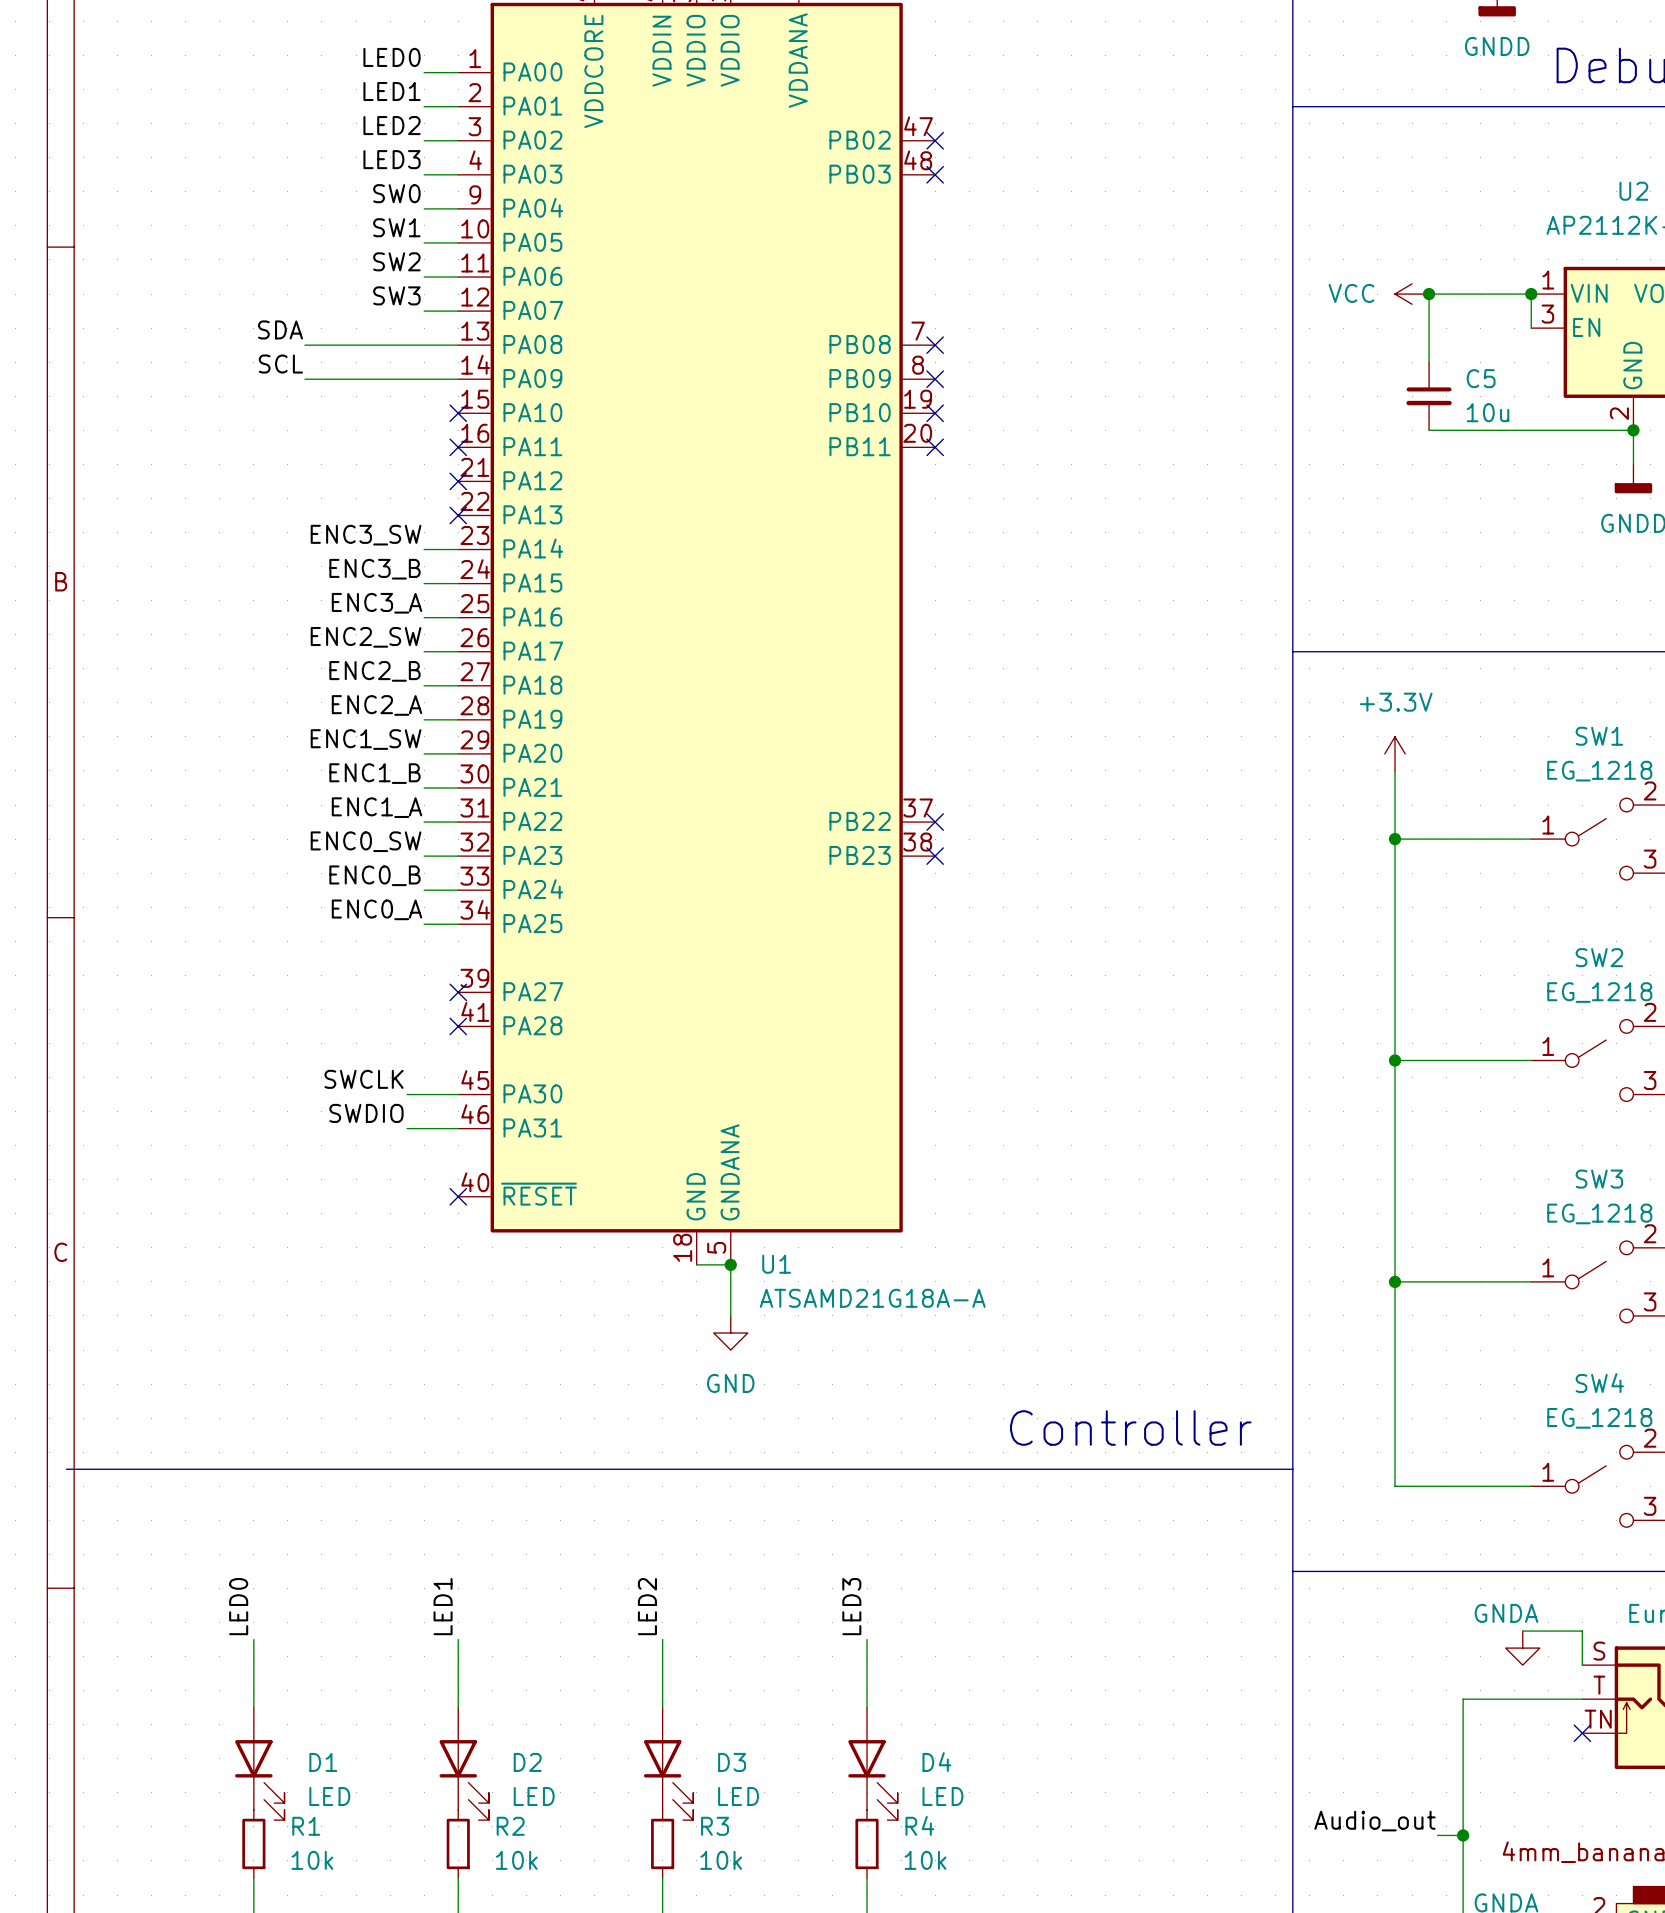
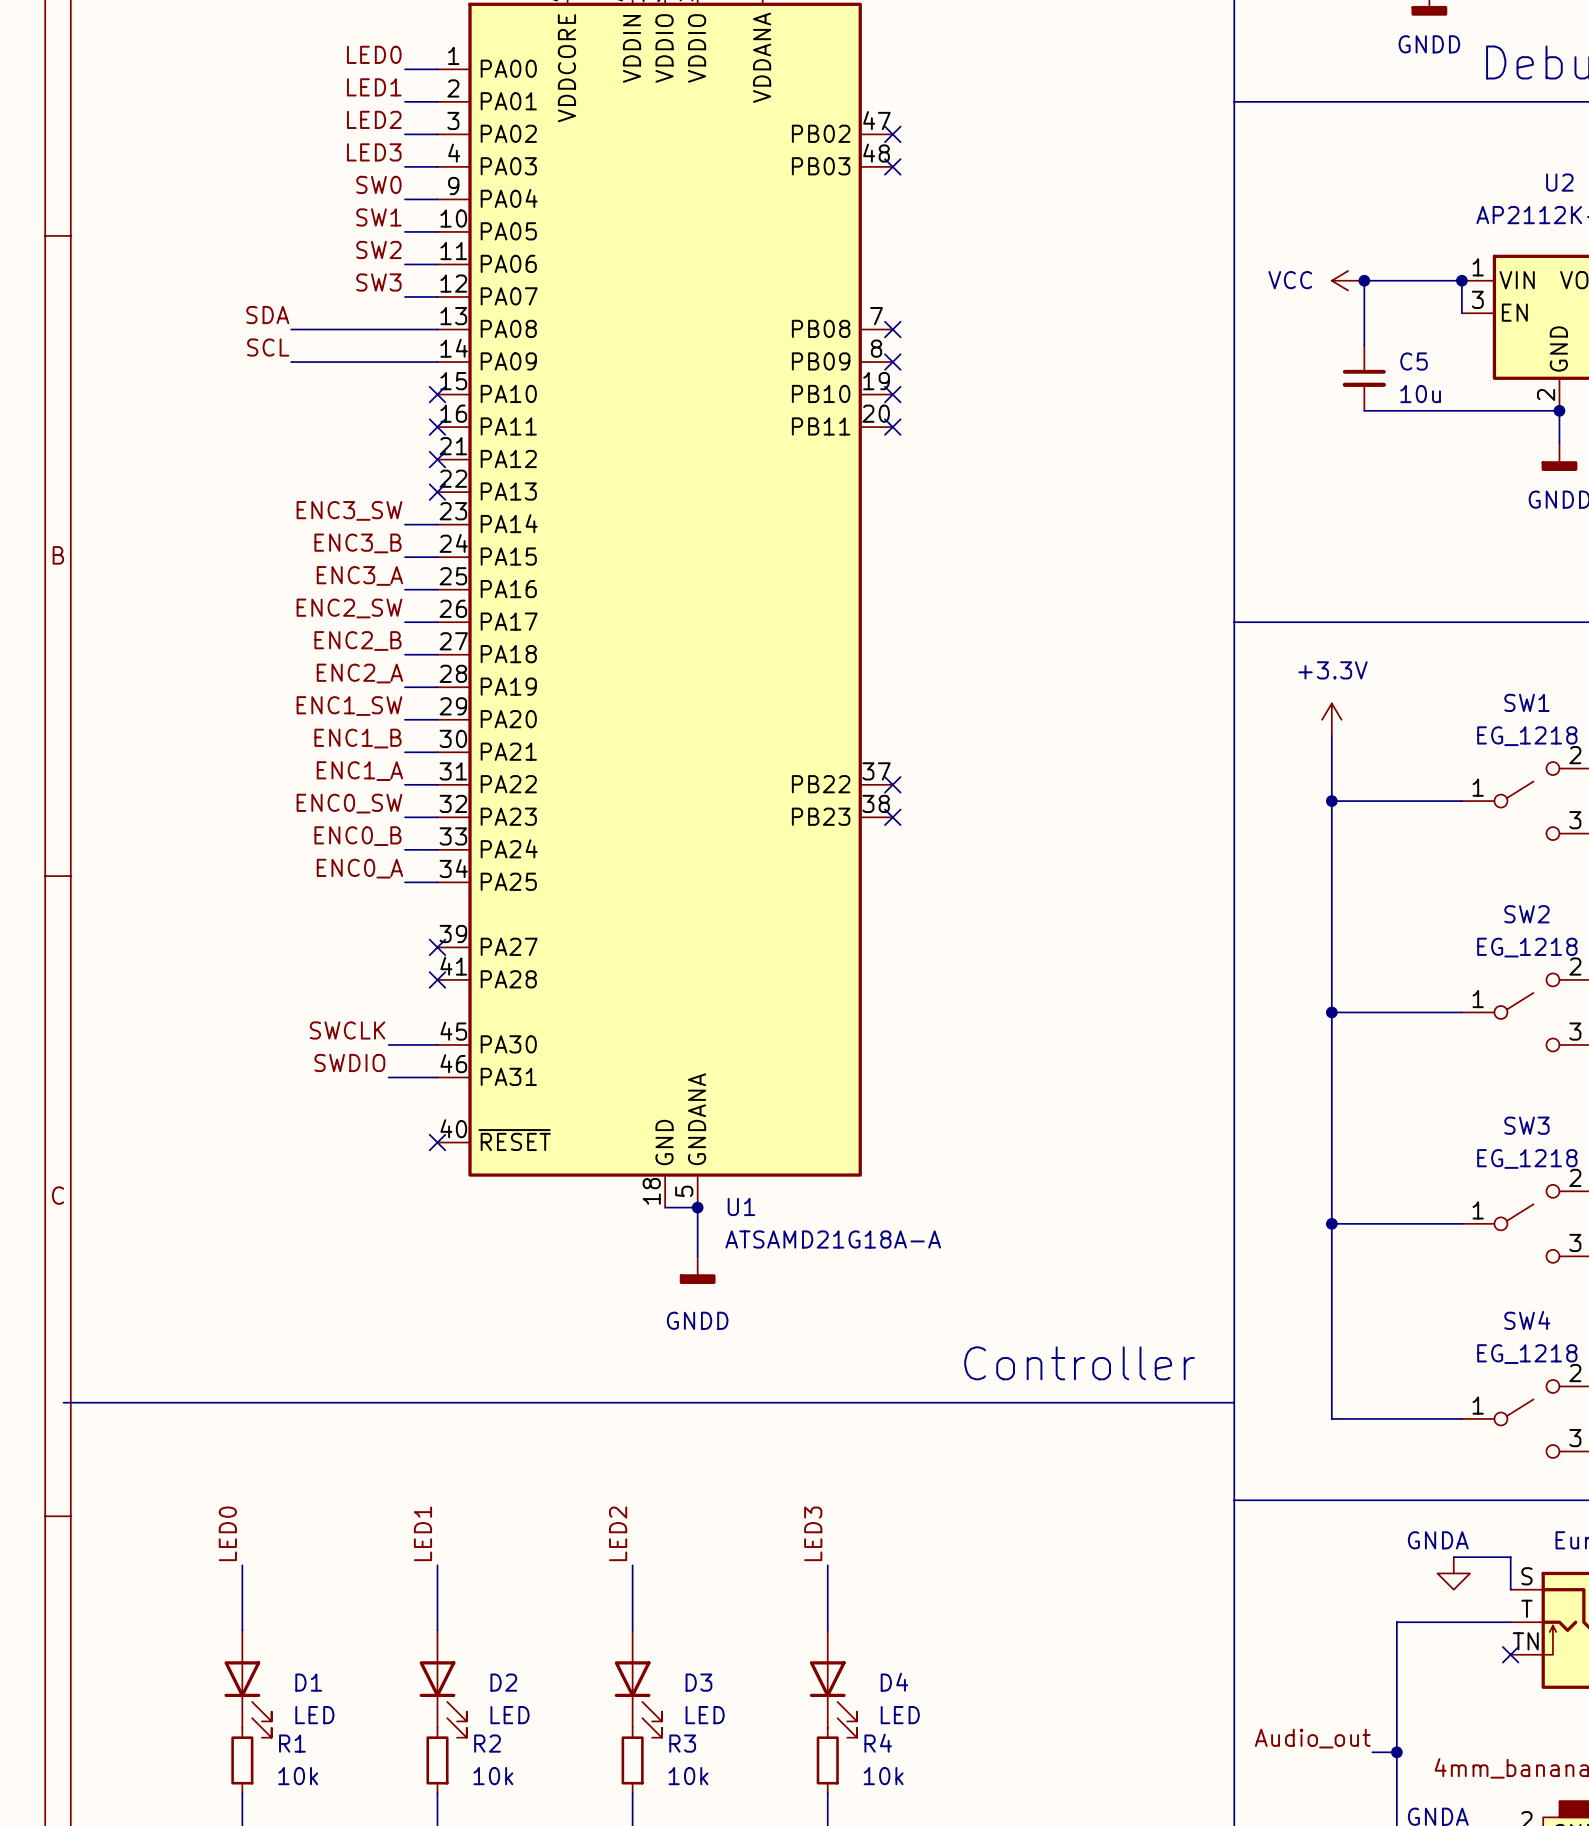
power symbol: GND (730, 1333) -> GNDD (697, 1270)

